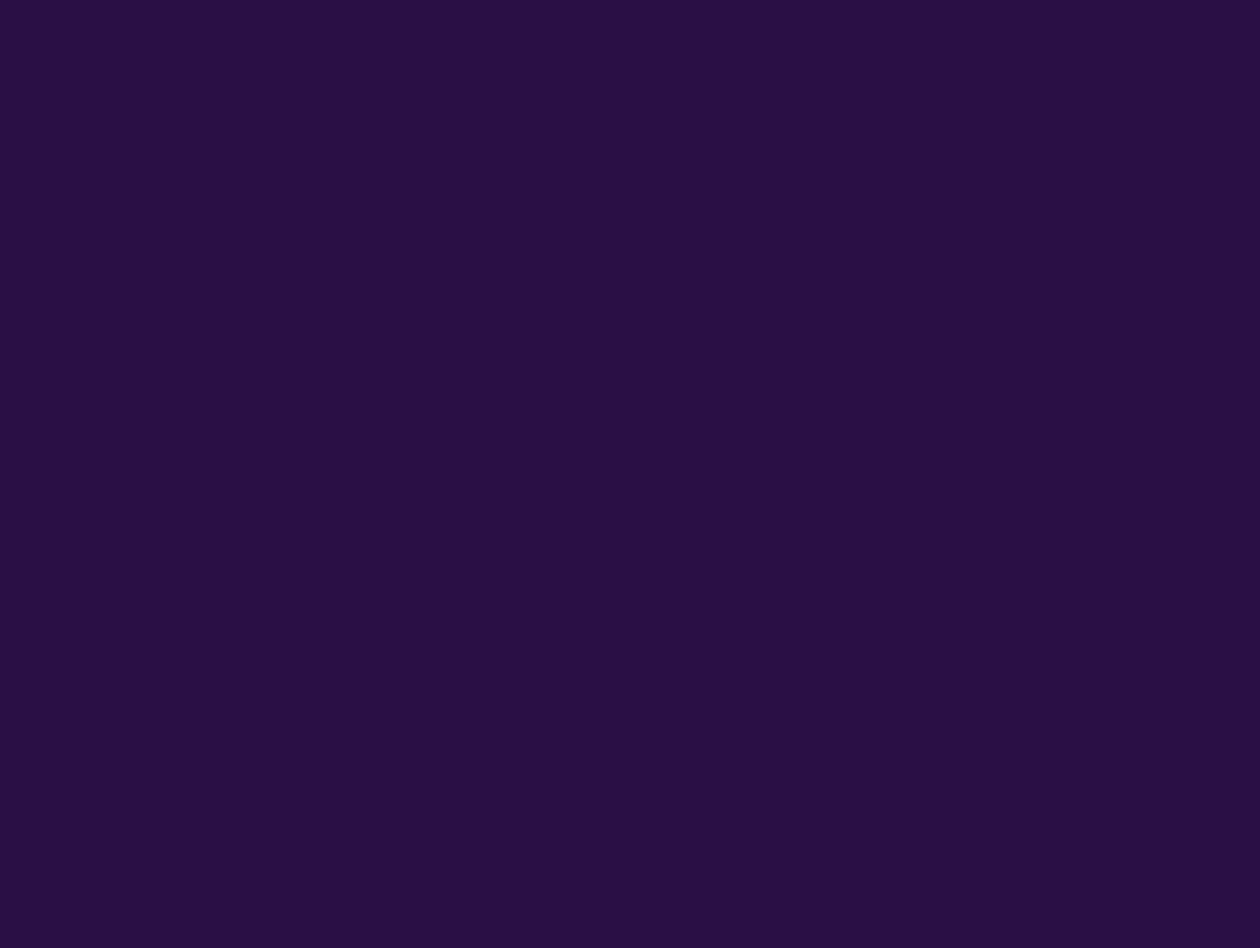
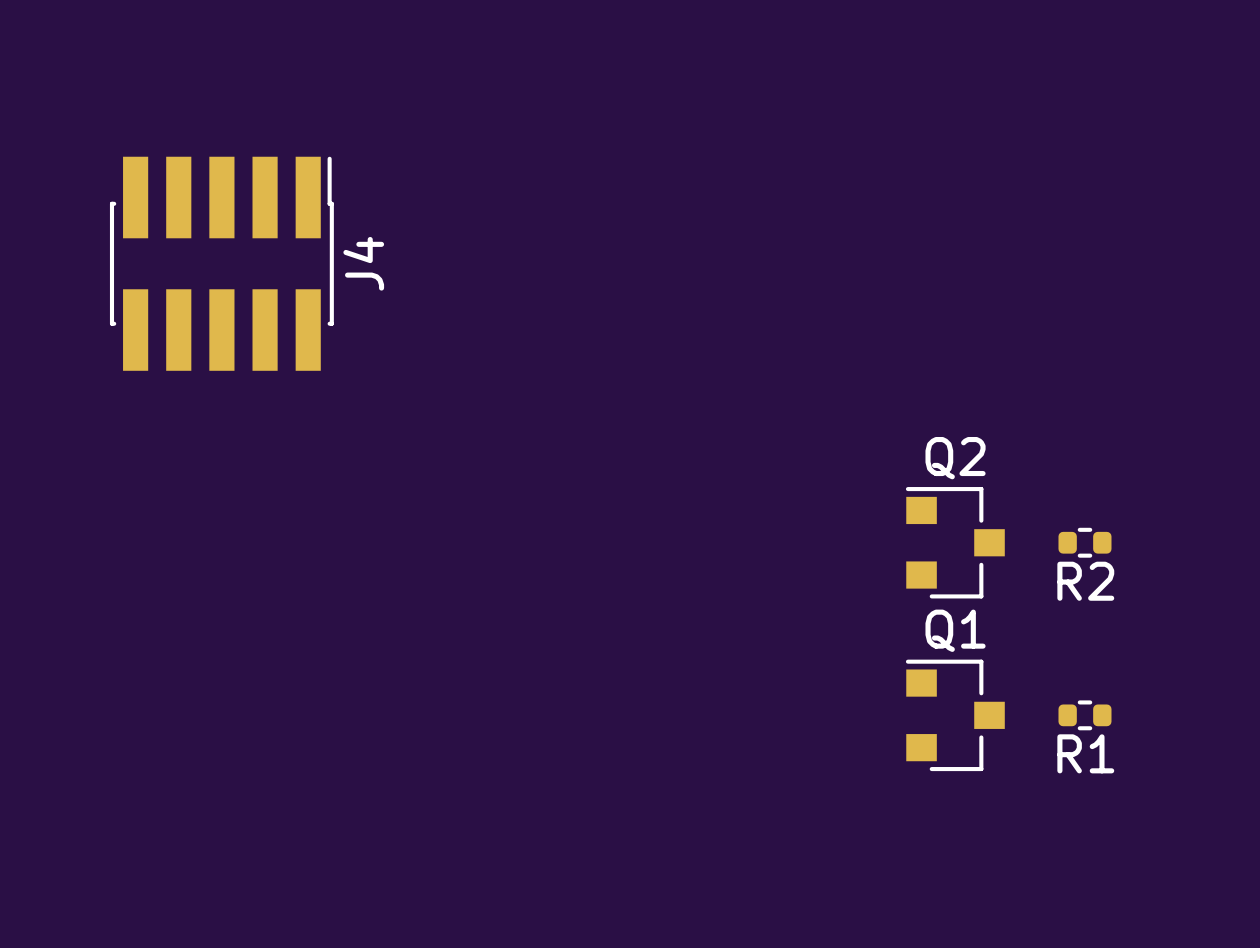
J4: none -> (221, 263)
Q2: none -> (955, 542)
R2: none -> (1084, 542)
Q1: none -> (955, 715)
R1: none -> (1084, 715)

